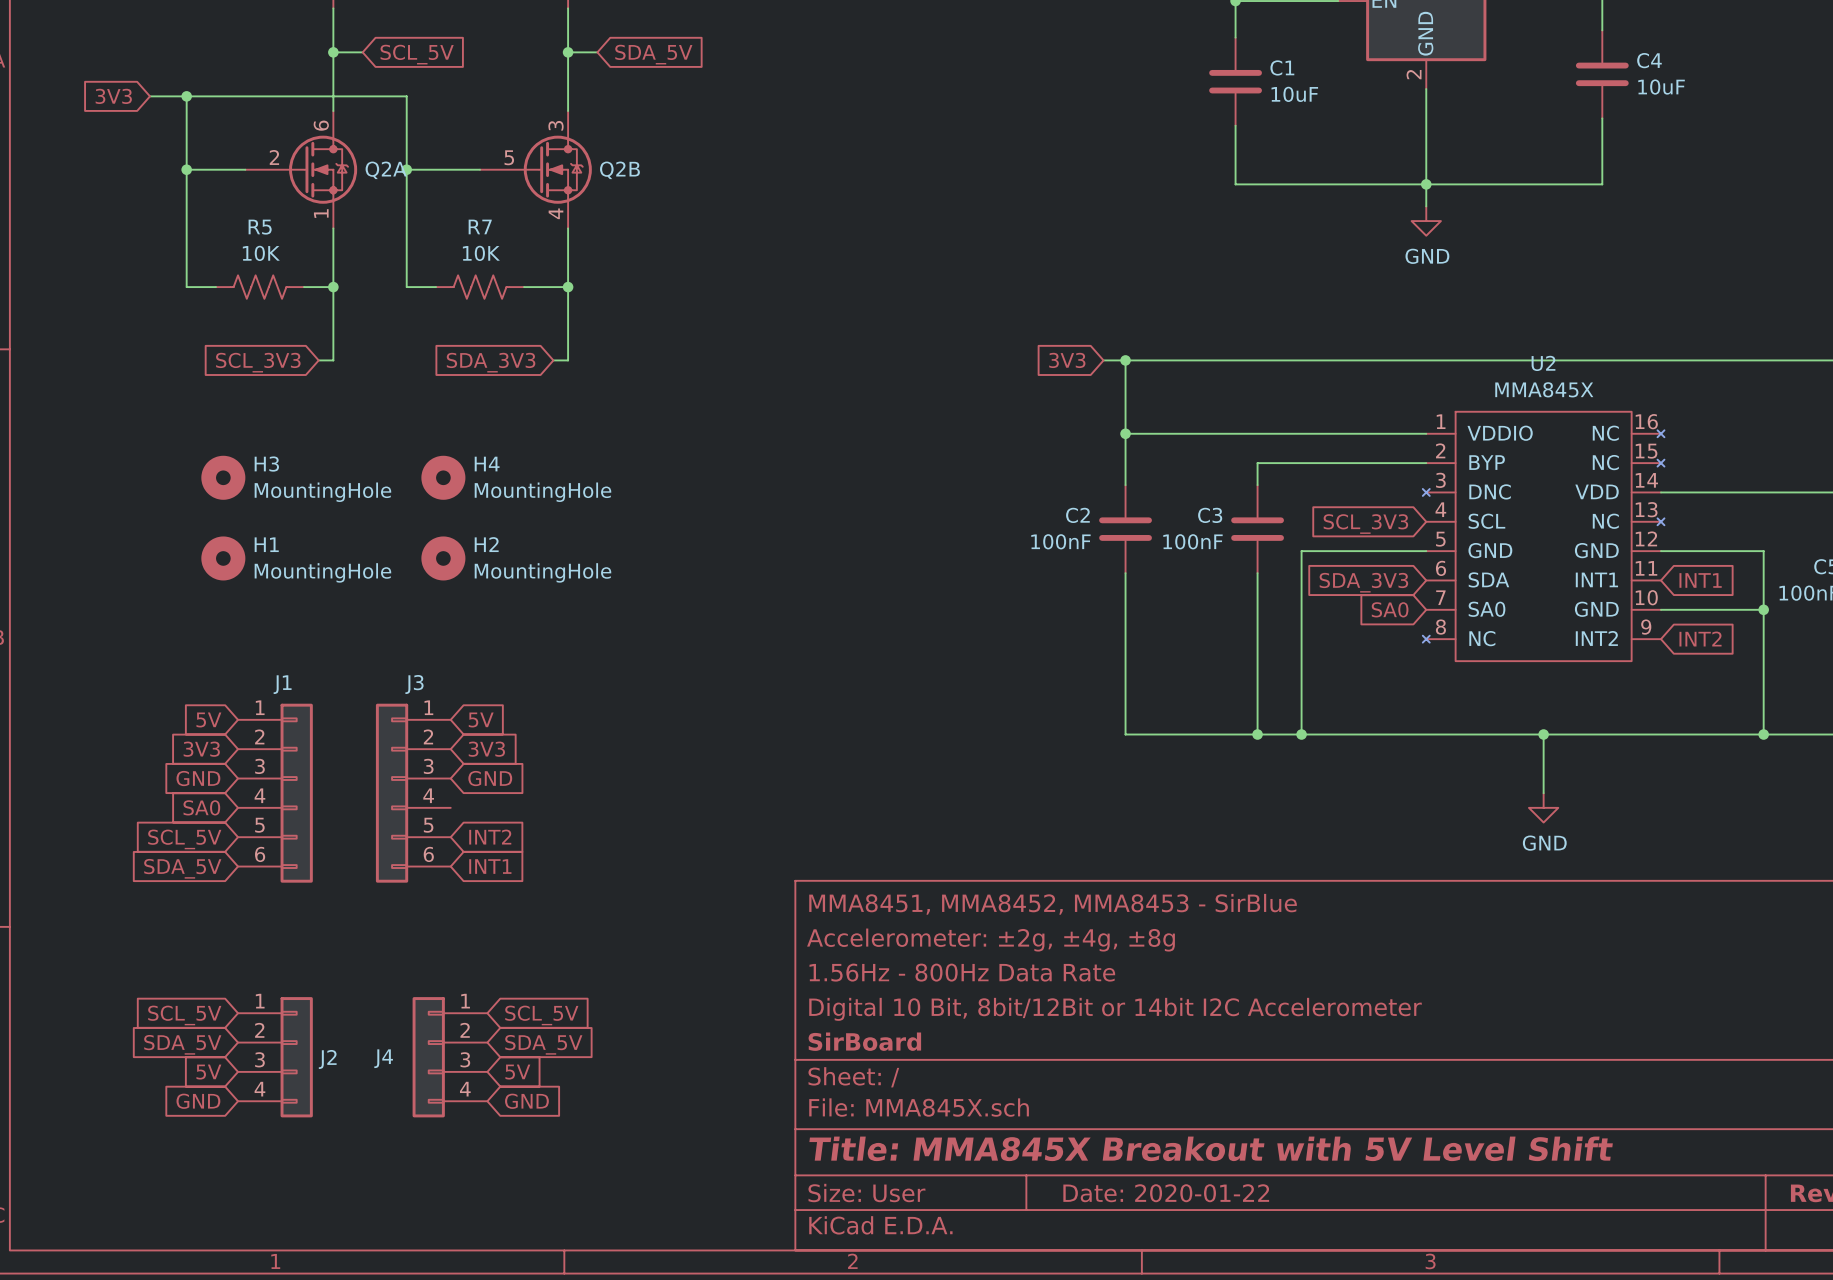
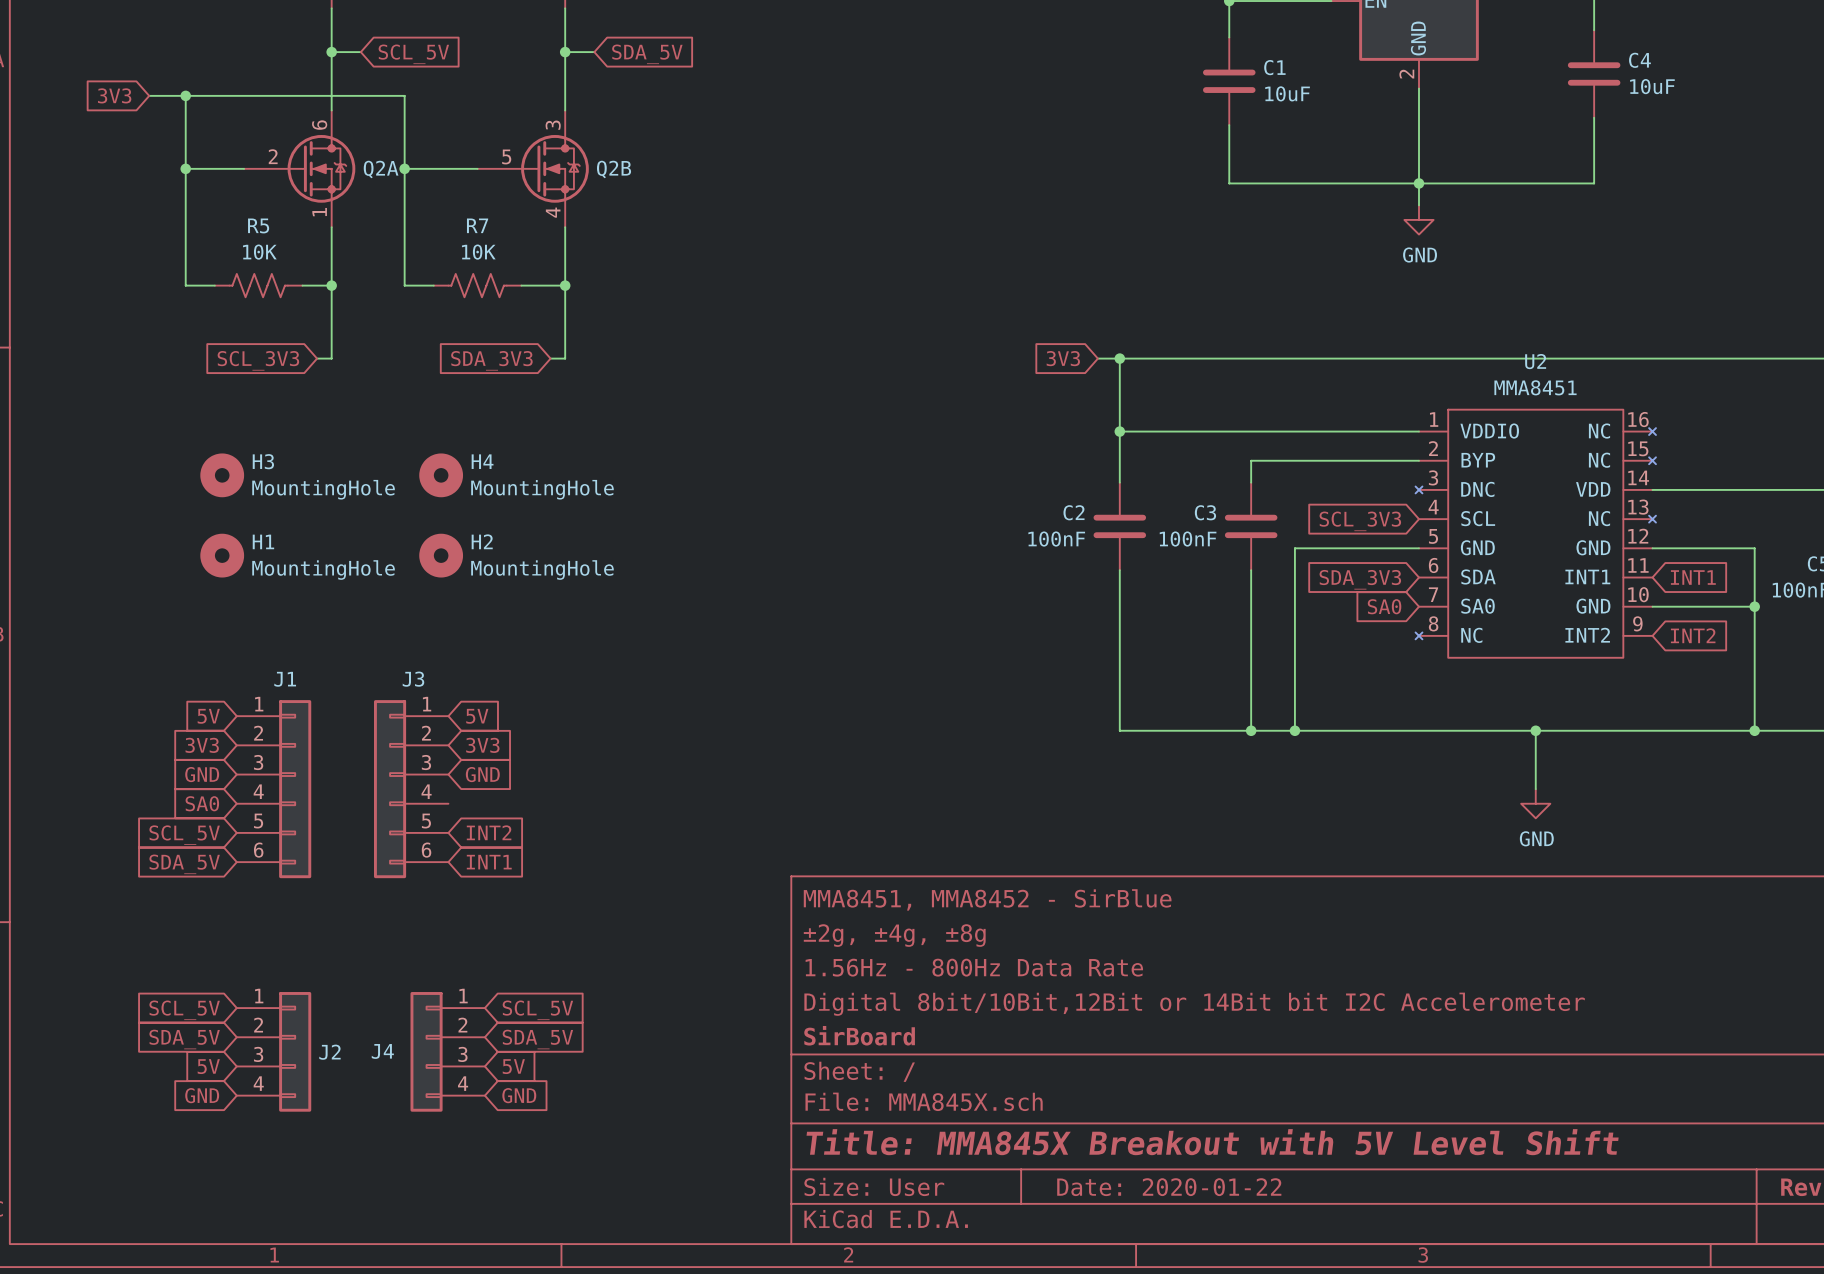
U2 value: MMA845X (1544, 389) -> MMA8451 (1535, 387)
title block: MMA8451, MMA8452, MMA8453 - SirBlue (1053, 904) -> MMA8451, MMA8452 - SirBlue (987, 899)
title block: Accelerometer: ±2g, ±4g, ±8g (990, 940) -> ±2g, ±4g, ±8g (894, 935)
title block: Digital 10 Bit, 8bit/12Bit or 14bit I2C Accelerometer (1115, 1009) -> Digital 8bit/10Bit,12Bit or 14Bit bit I2C Accelerometer (1194, 1004)

